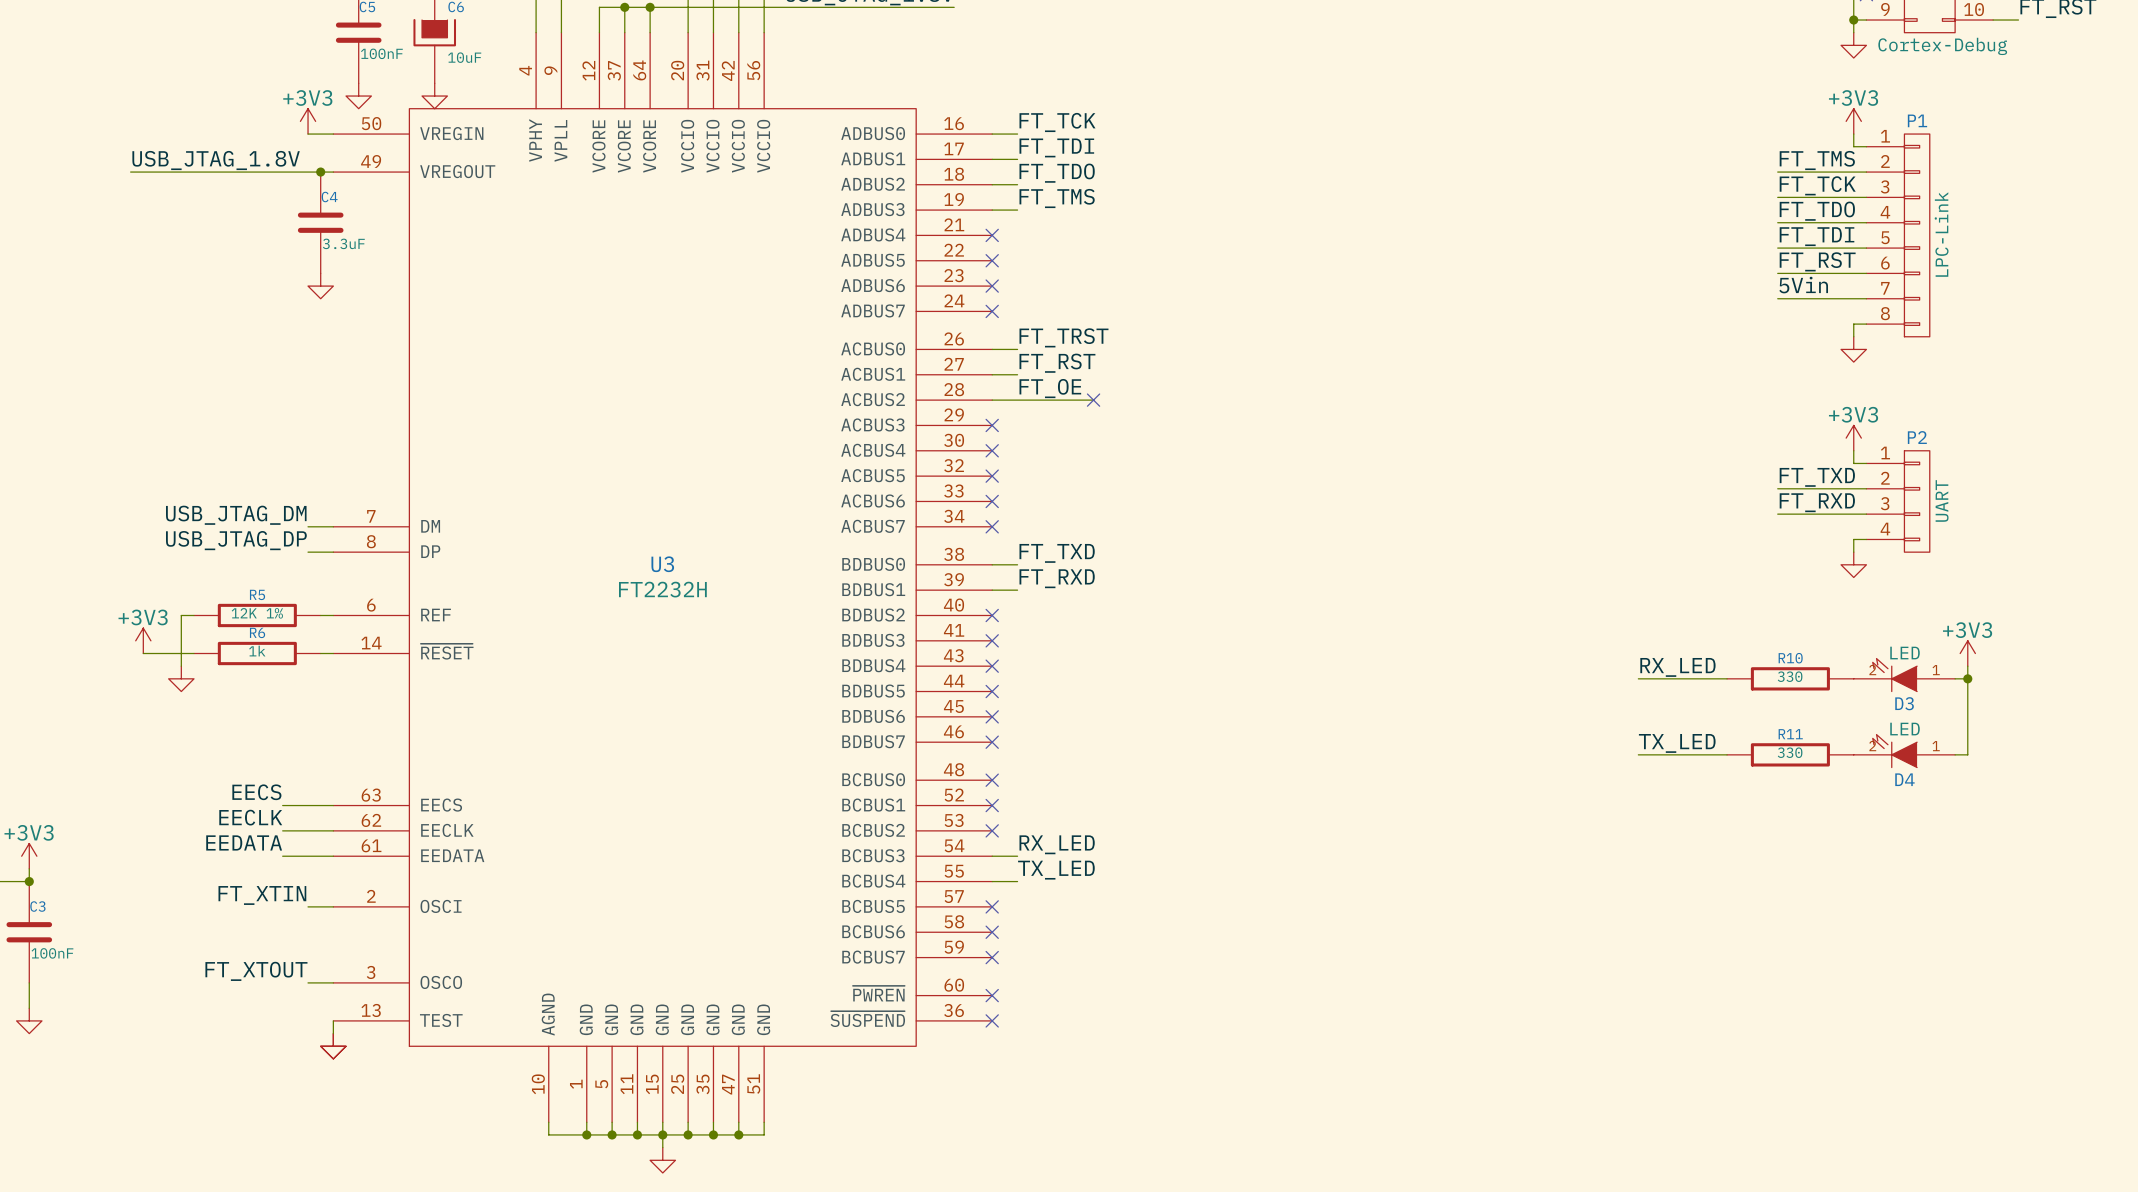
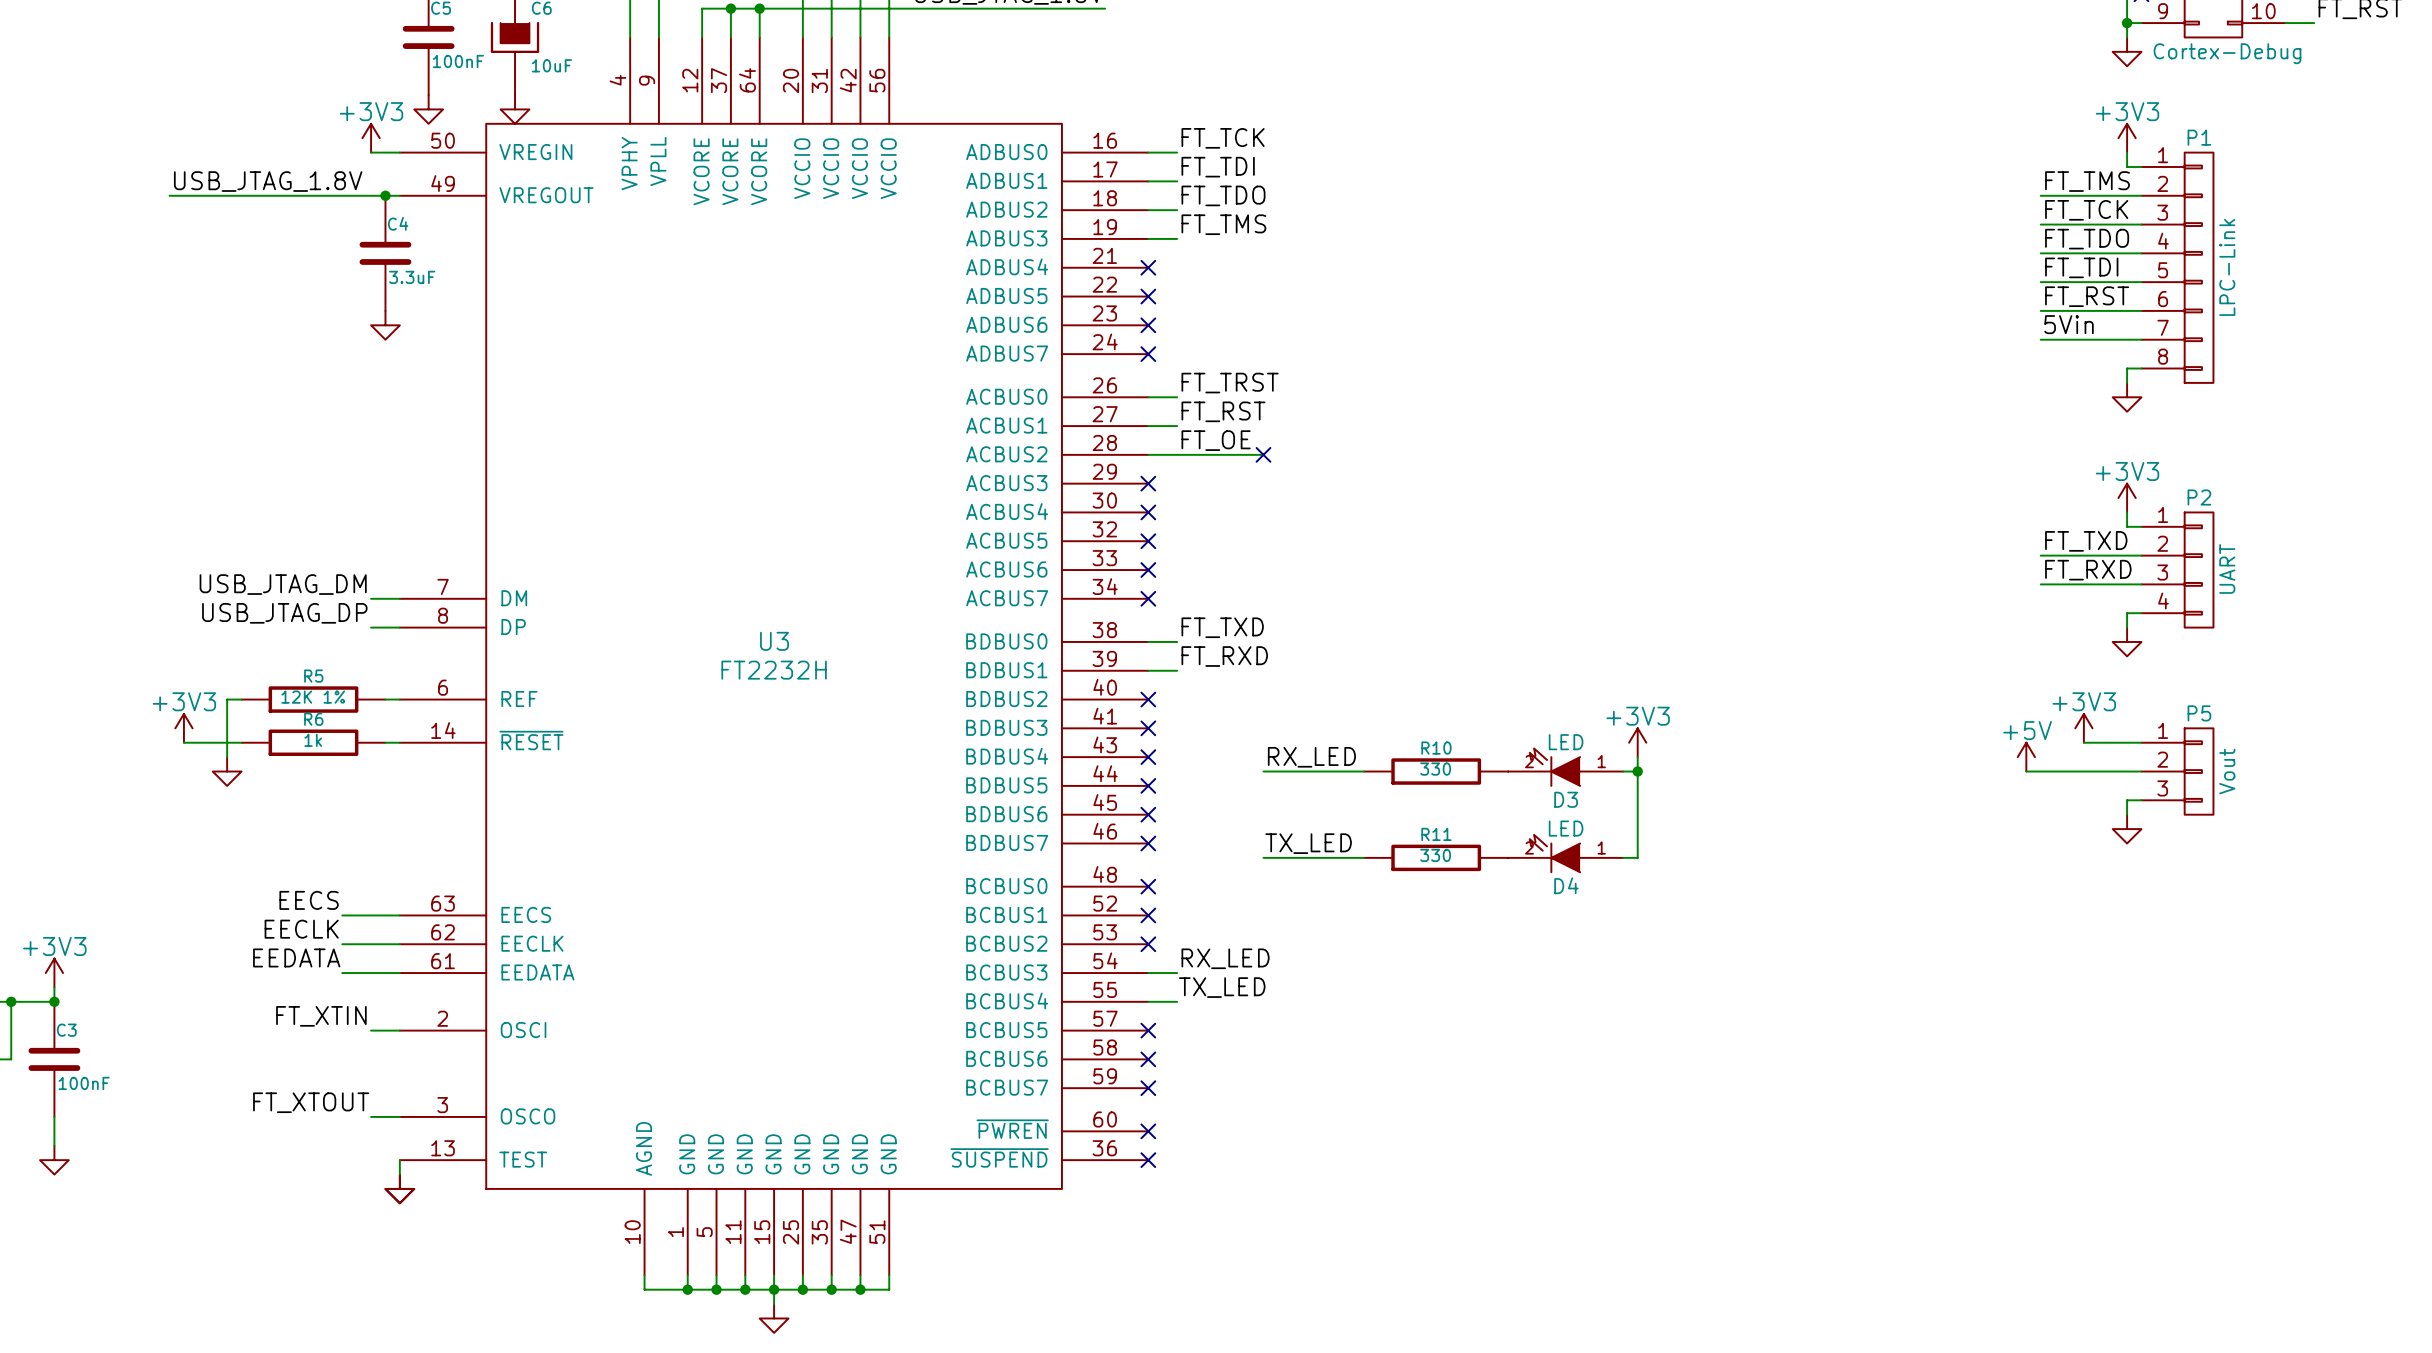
power symbol: none -> +3V3 (1637, 742)
wire: none -> (2083, 742) (2141, 742)
power symbol position: +3V3 (1967, 653) -> +3V3 (2083, 728)
wire: none -> (1637, 757) (1637, 857) (1623, 857)
power symbol: none -> +5V (2026, 757)
wire: (1967, 666) (1967, 754) (1955, 754) -> none
label: none -> RX_LED (1311, 757)
label: RX_LED (1677, 667) -> none
D3 position: (1904, 675) -> (1565, 767)
wire: none -> (1263, 771) (1364, 771)
wire: none -> (1623, 771) (1637, 771)
junction: none -> (1637, 771)
wire: (1638, 678) (1727, 678) -> none
wire: none -> (2026, 771) (2141, 771)
R10 position: (1790, 678) -> (1436, 771)
P5: none -> Vout (2177, 771)
wire: (1955, 678) (1967, 678) -> none
junction: (1967, 678) -> none
wire: none -> (2141, 800) (2127, 800) (2127, 814)
power symbol: none -> (2127, 829)
label: none -> TX_LED (1308, 843)
label: TX_LED (1677, 743) -> none
D4 position: (1904, 751) -> (1565, 853)
wire: none -> (1263, 857) (1364, 857)
wire: (1638, 754) (1727, 754) -> none
R11 position: (1790, 754) -> (1436, 857)

